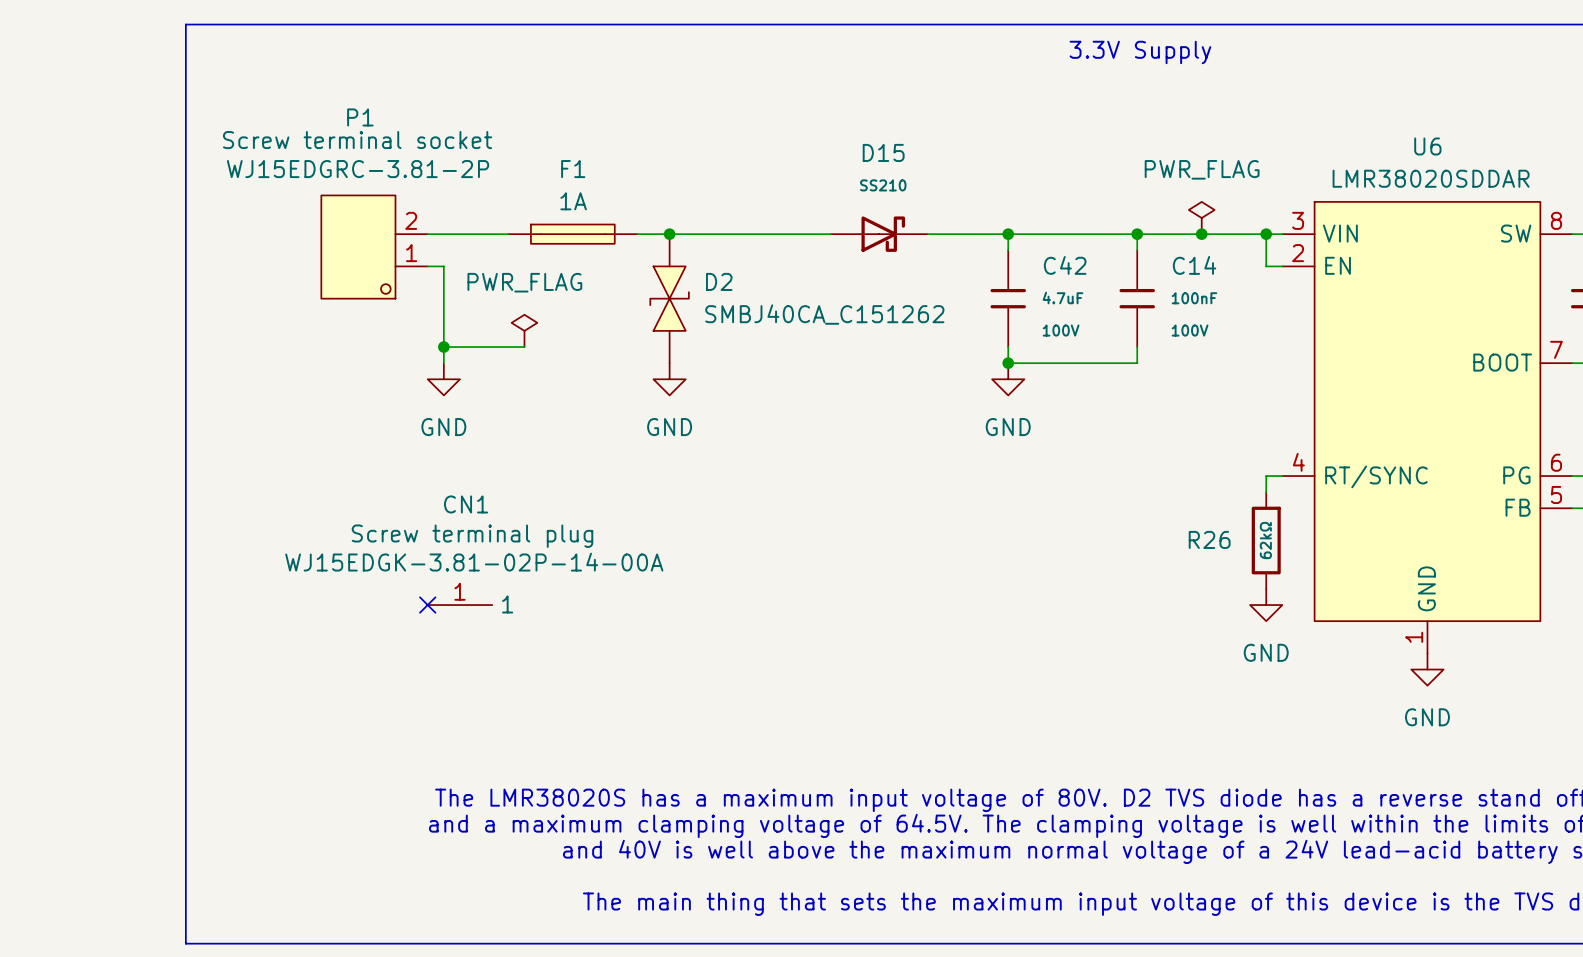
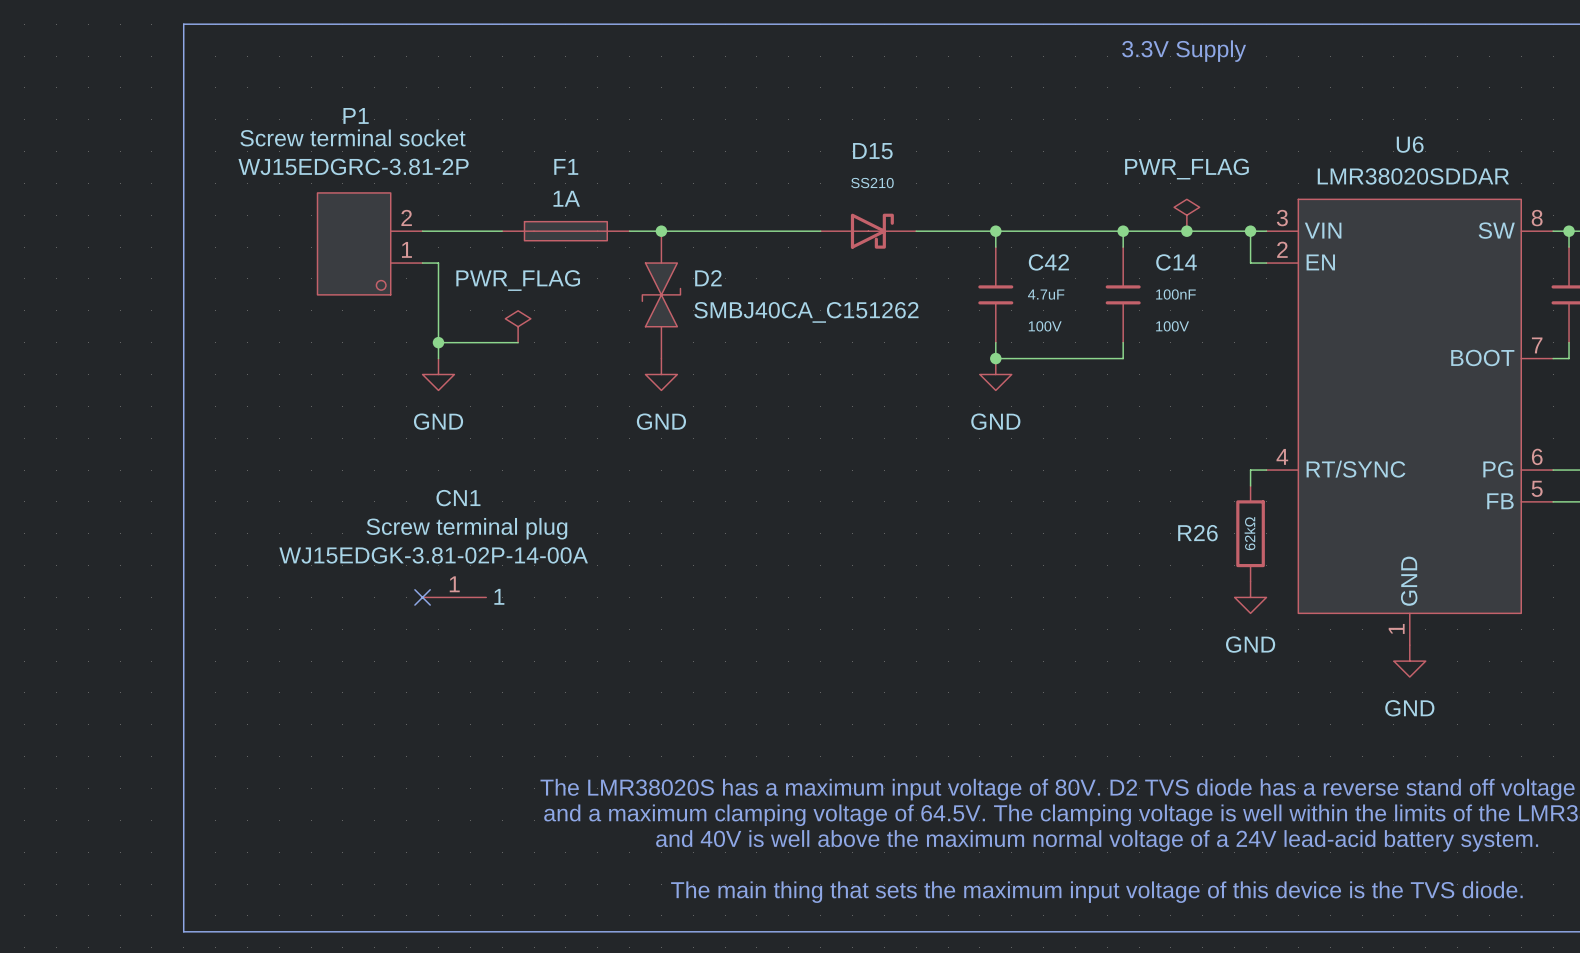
text position: 3.3V Supply (1140, 52) -> 3.3V Supply (1184, 51)

